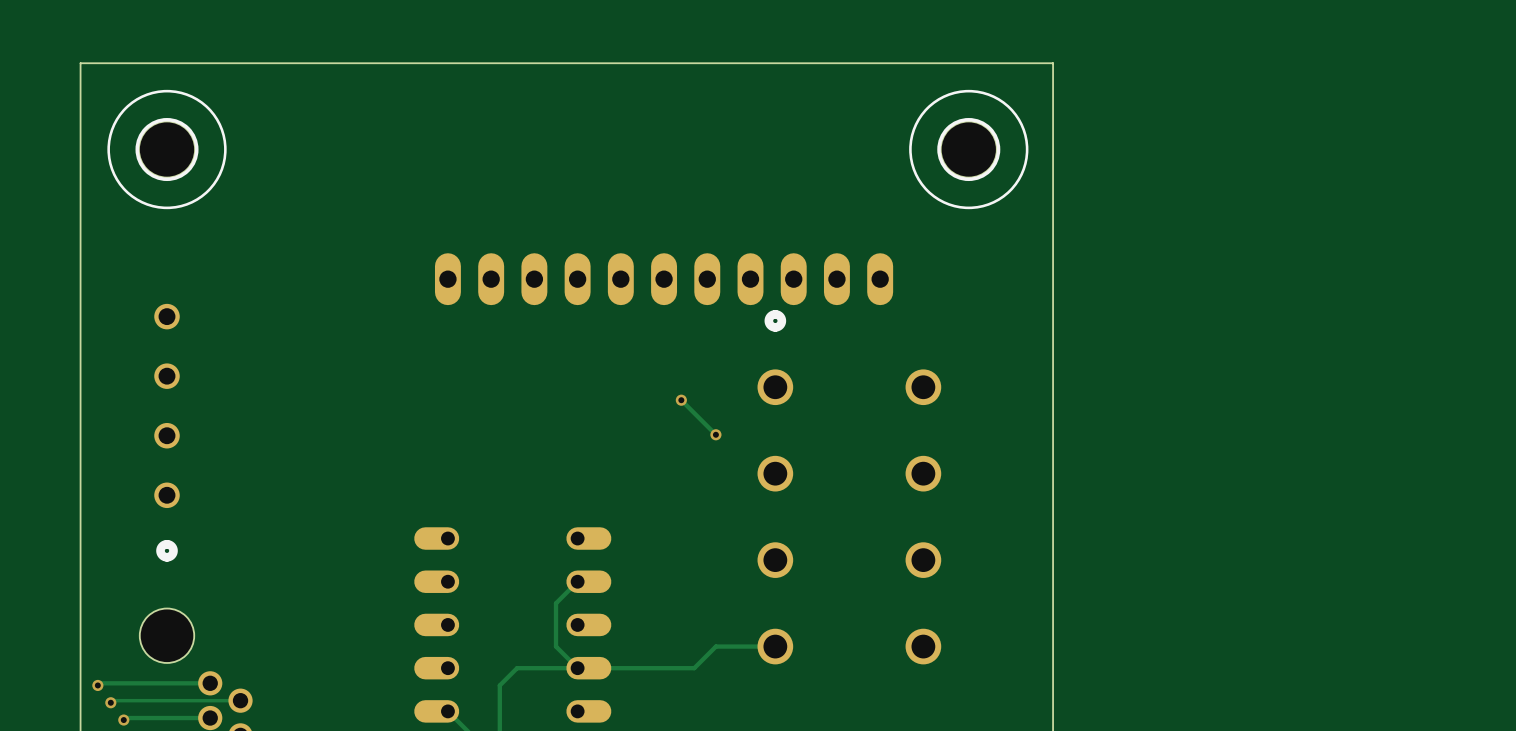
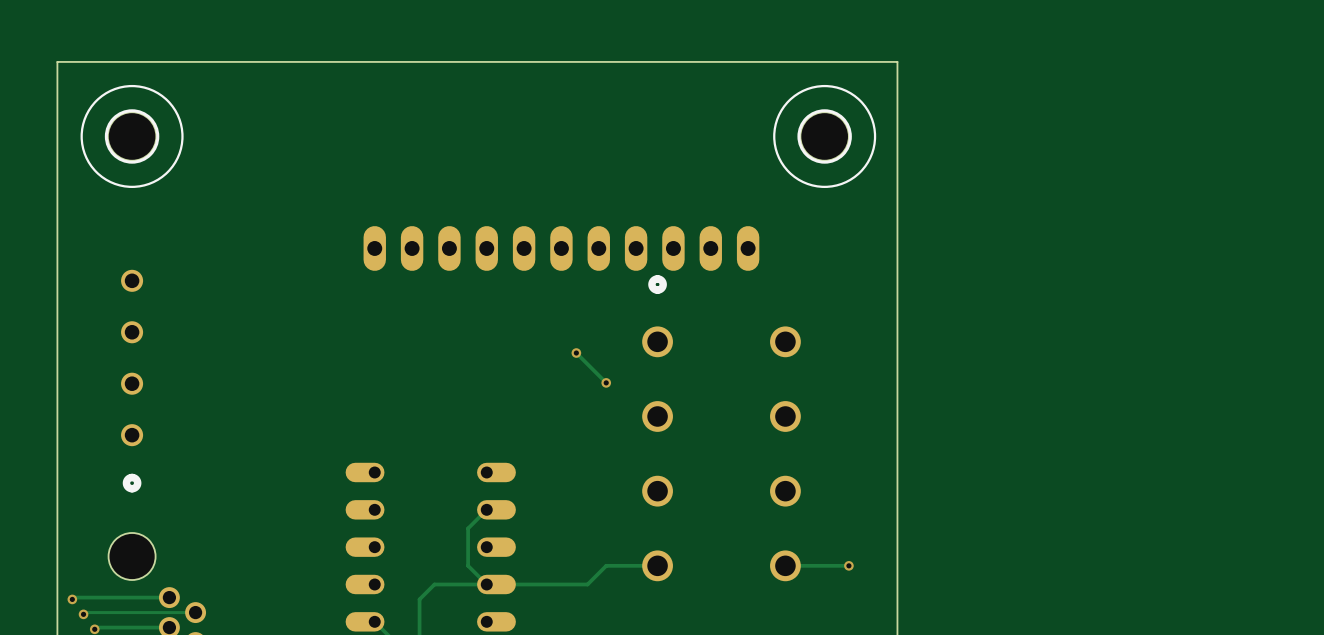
track: none -> (848, 565) (785, 565)
via: none -> (848, 565)

